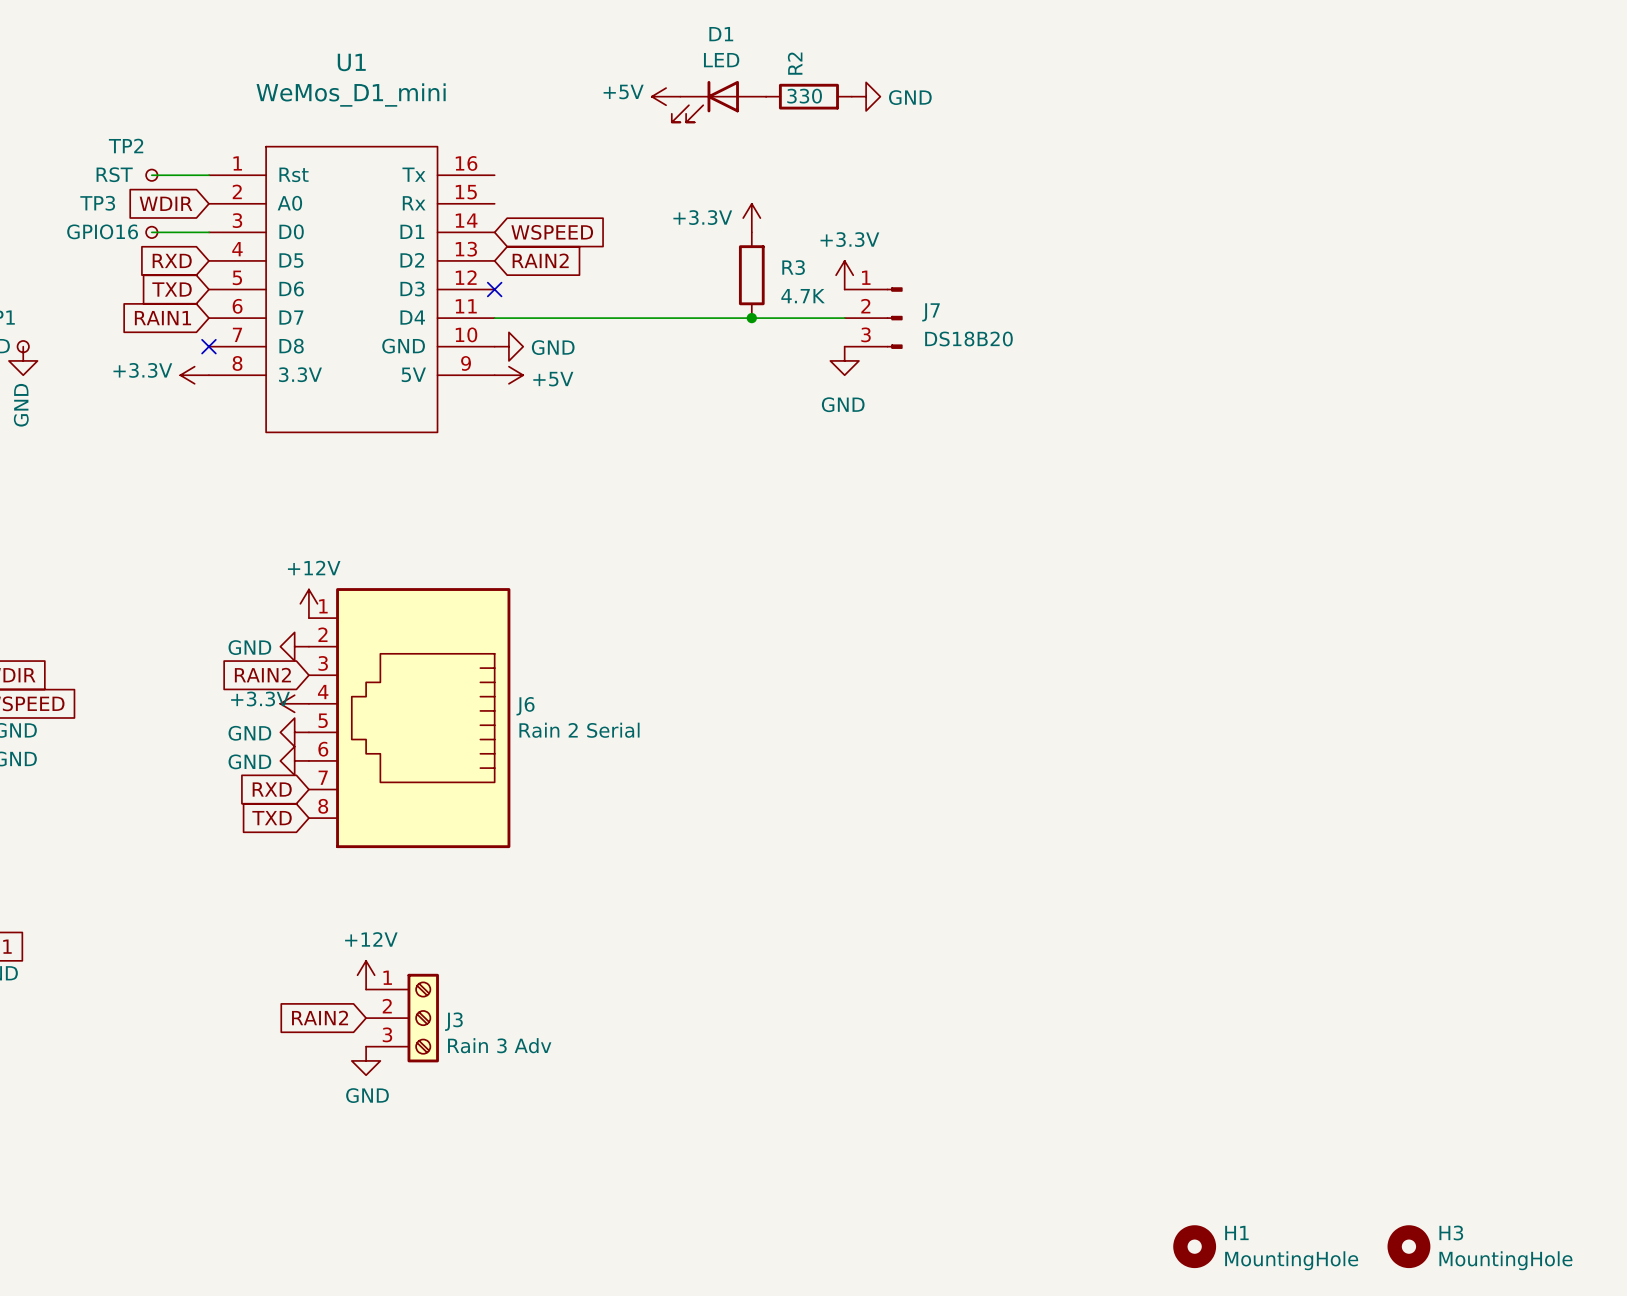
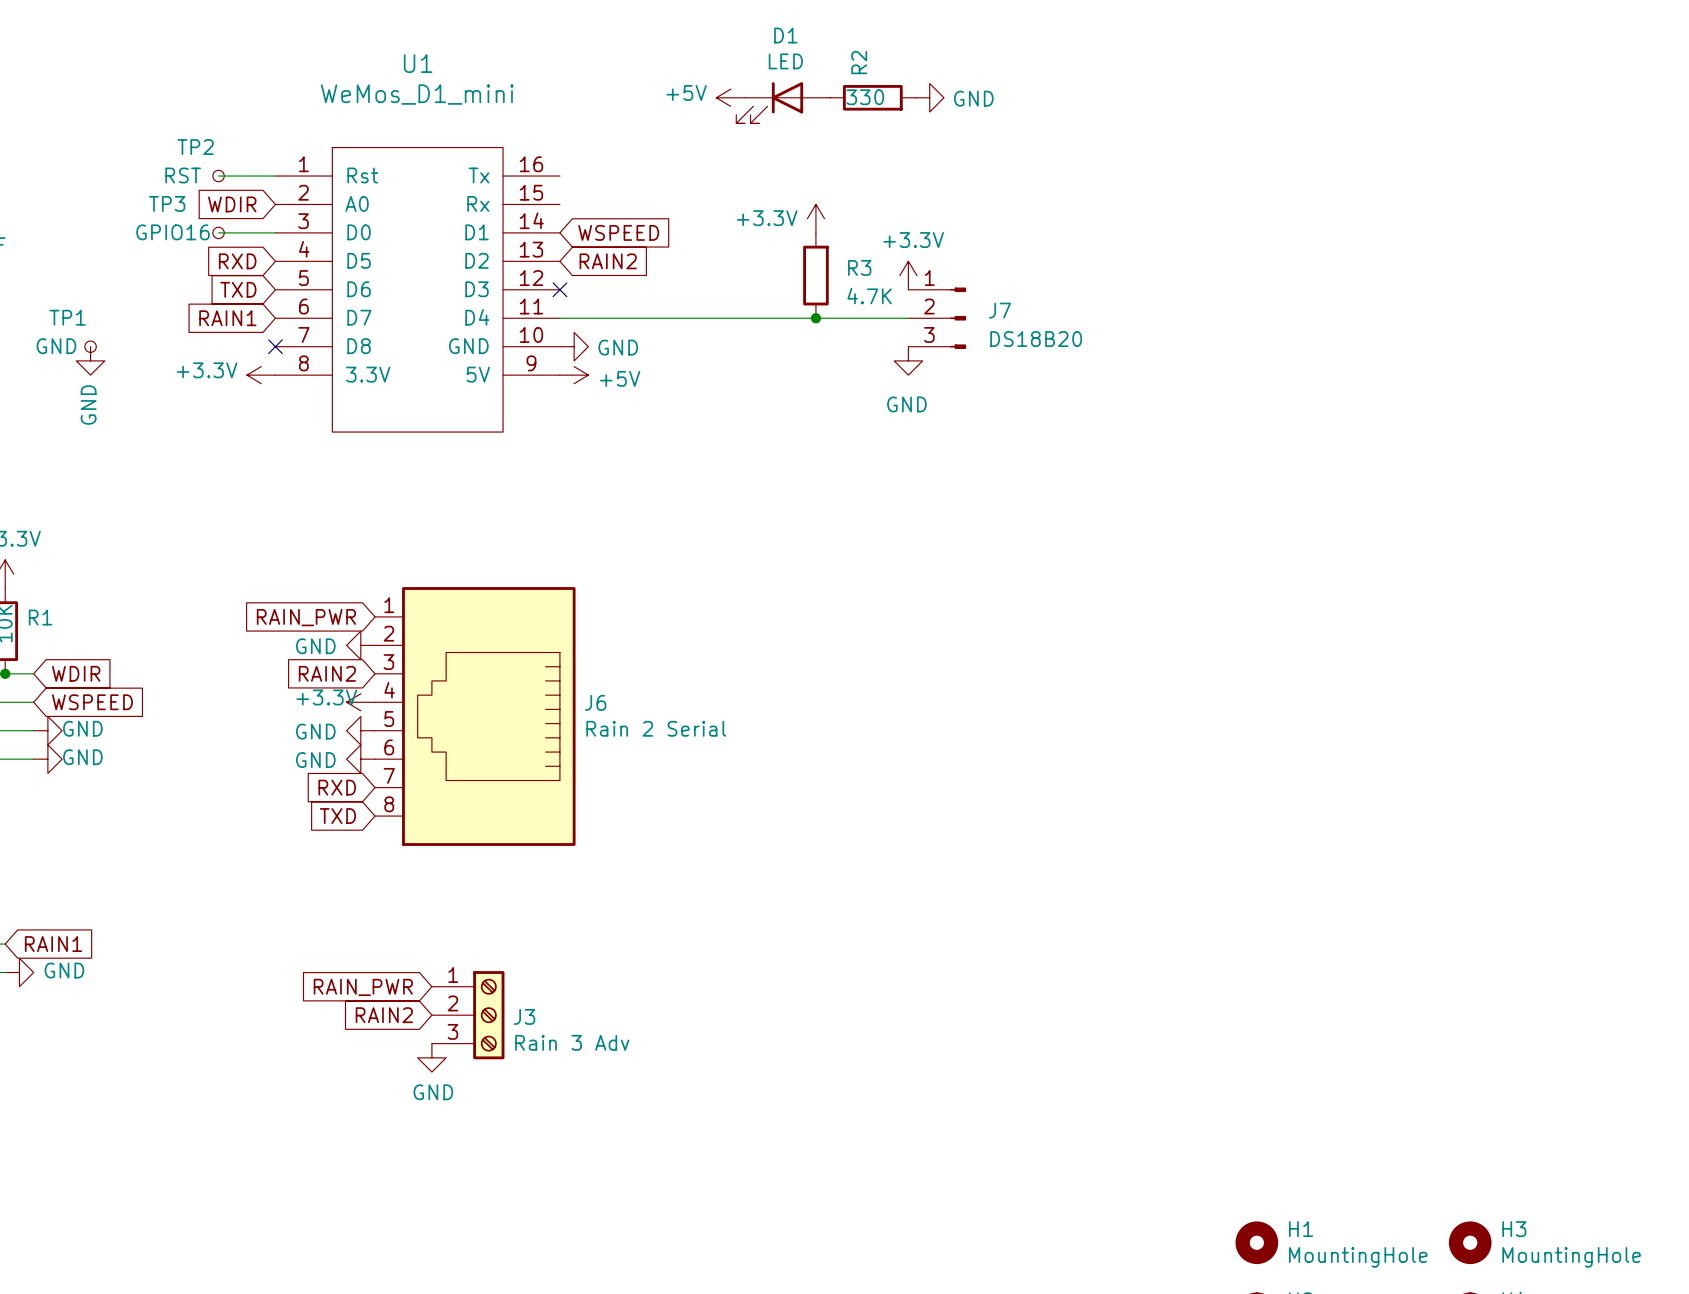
power symbol: +12V (308, 603) -> none
global label: none -> RAIN_PWR (306, 617)
power symbol: +12V (366, 975) -> none
global label: none -> RAIN_PWR (363, 987)

